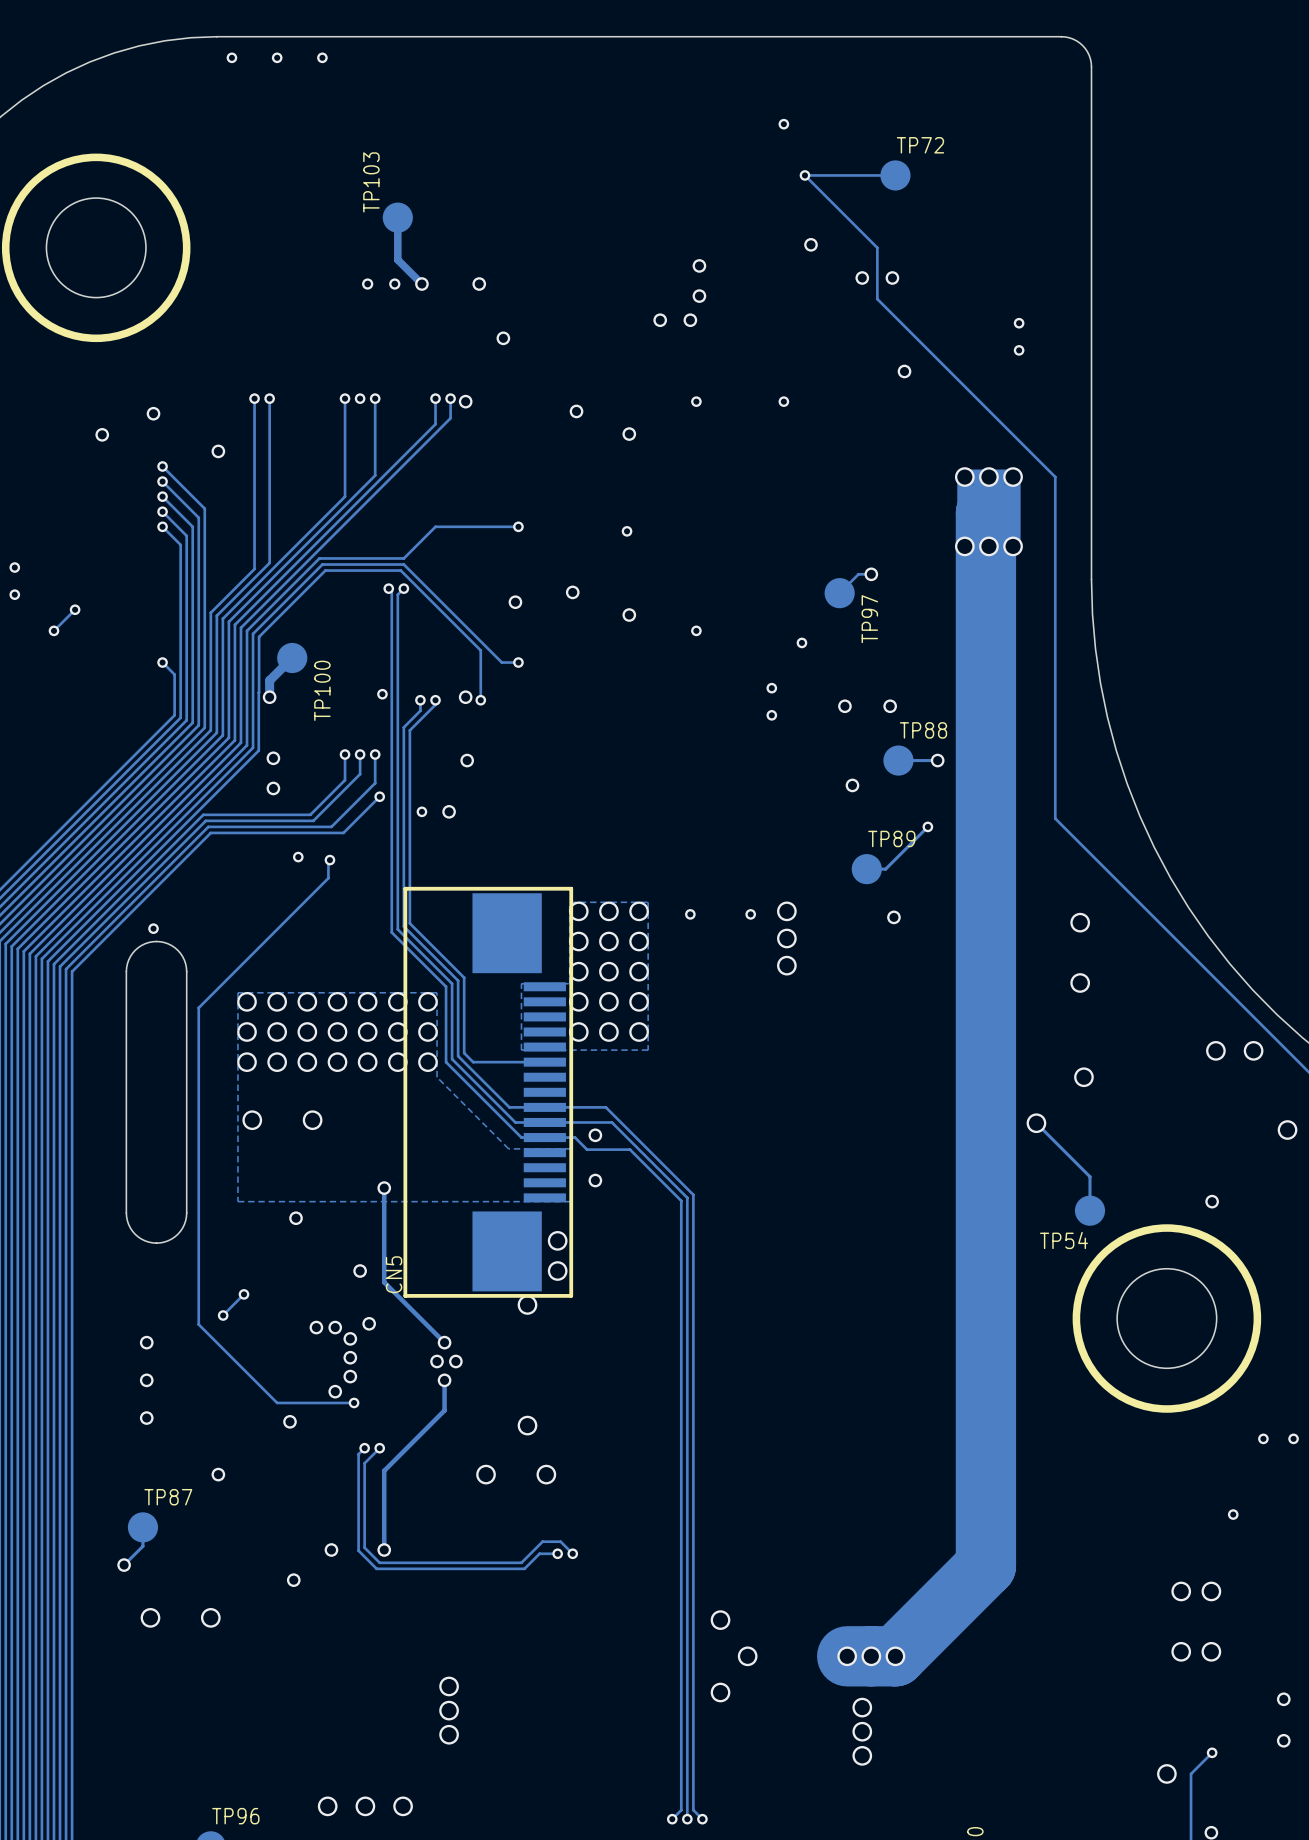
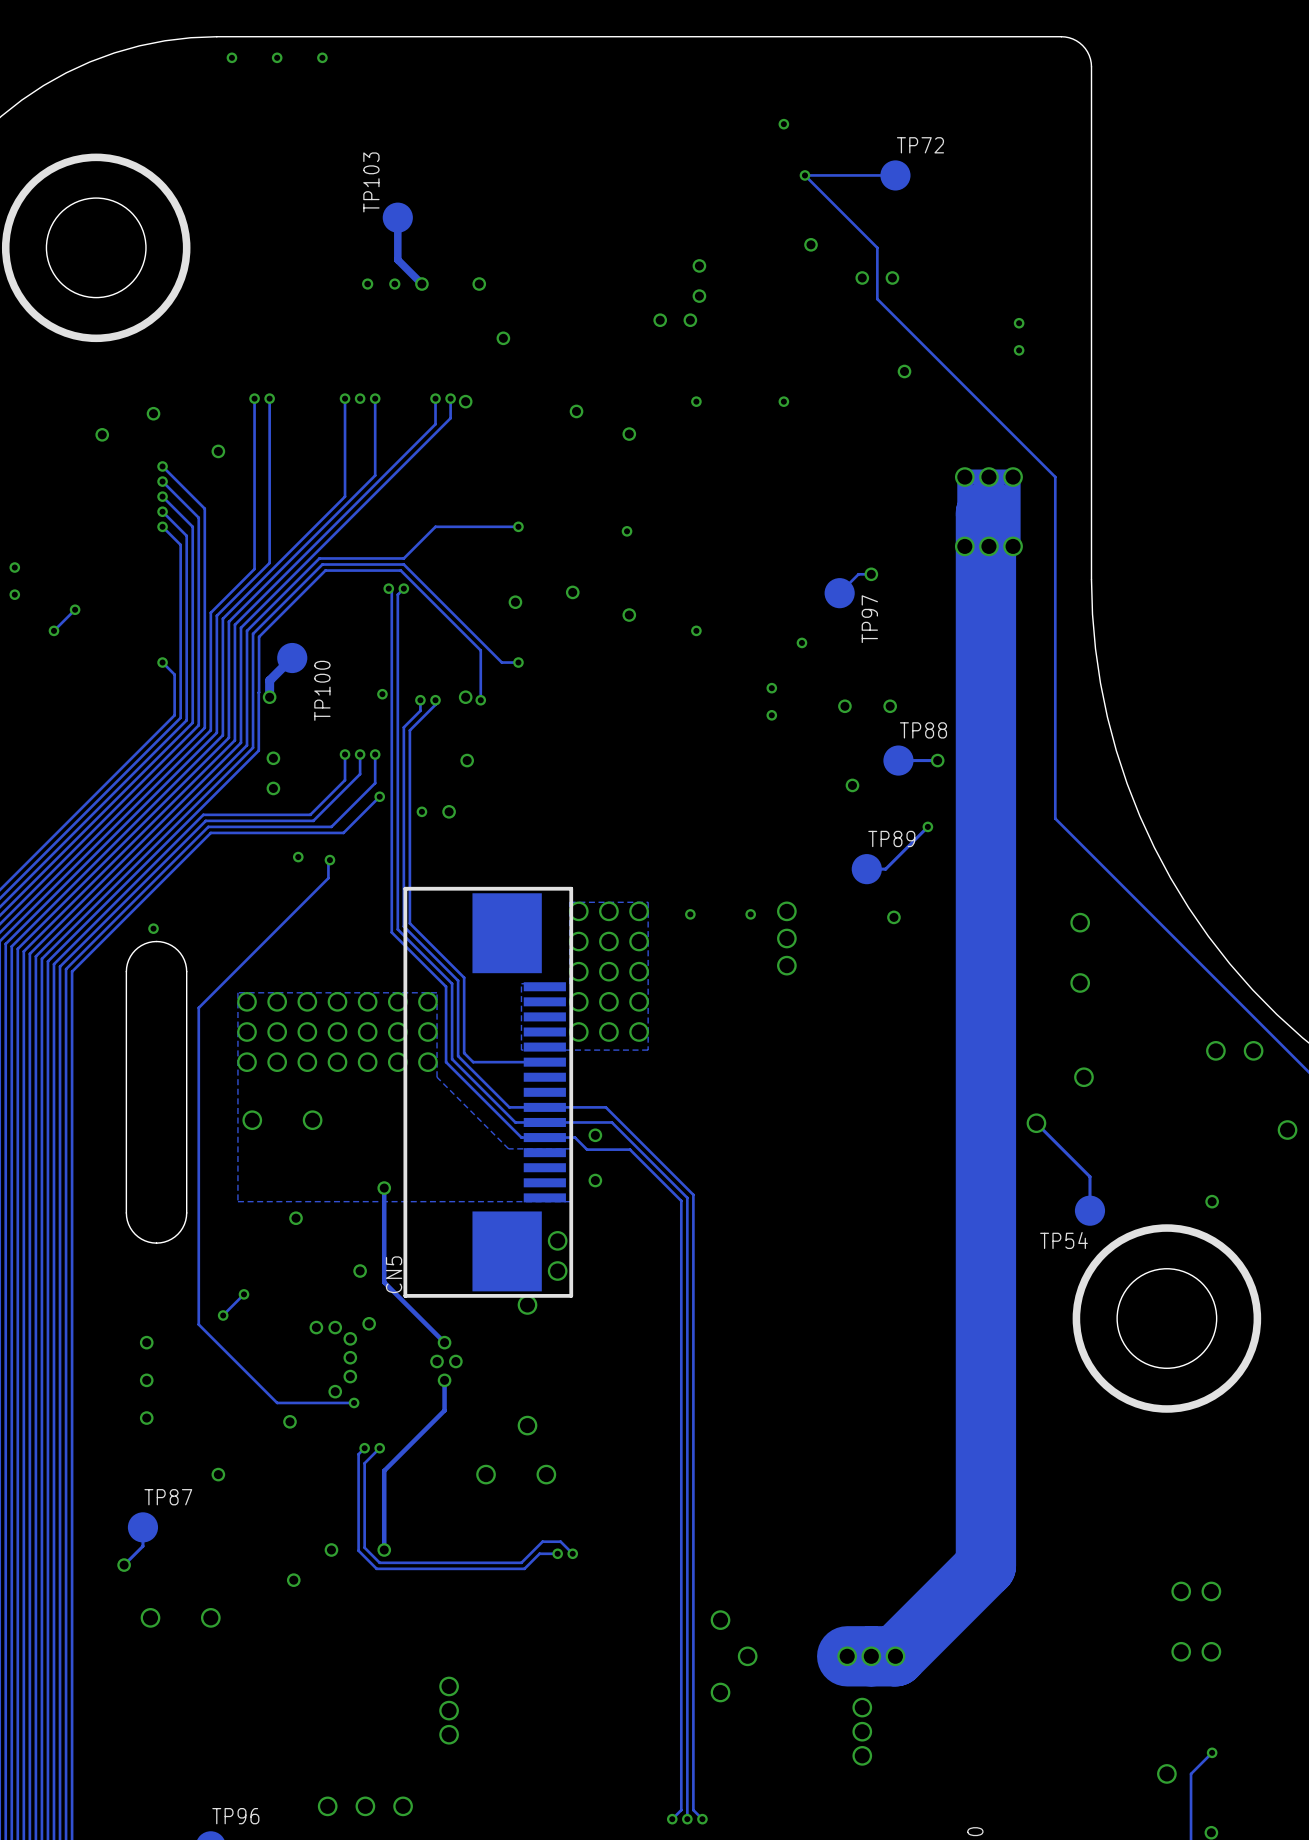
via: (1263, 1438) -> none
via: (1293, 1438) -> none
via: (1233, 1514) -> none
via: (1283, 1699) -> none
via: (1283, 1740) -> none

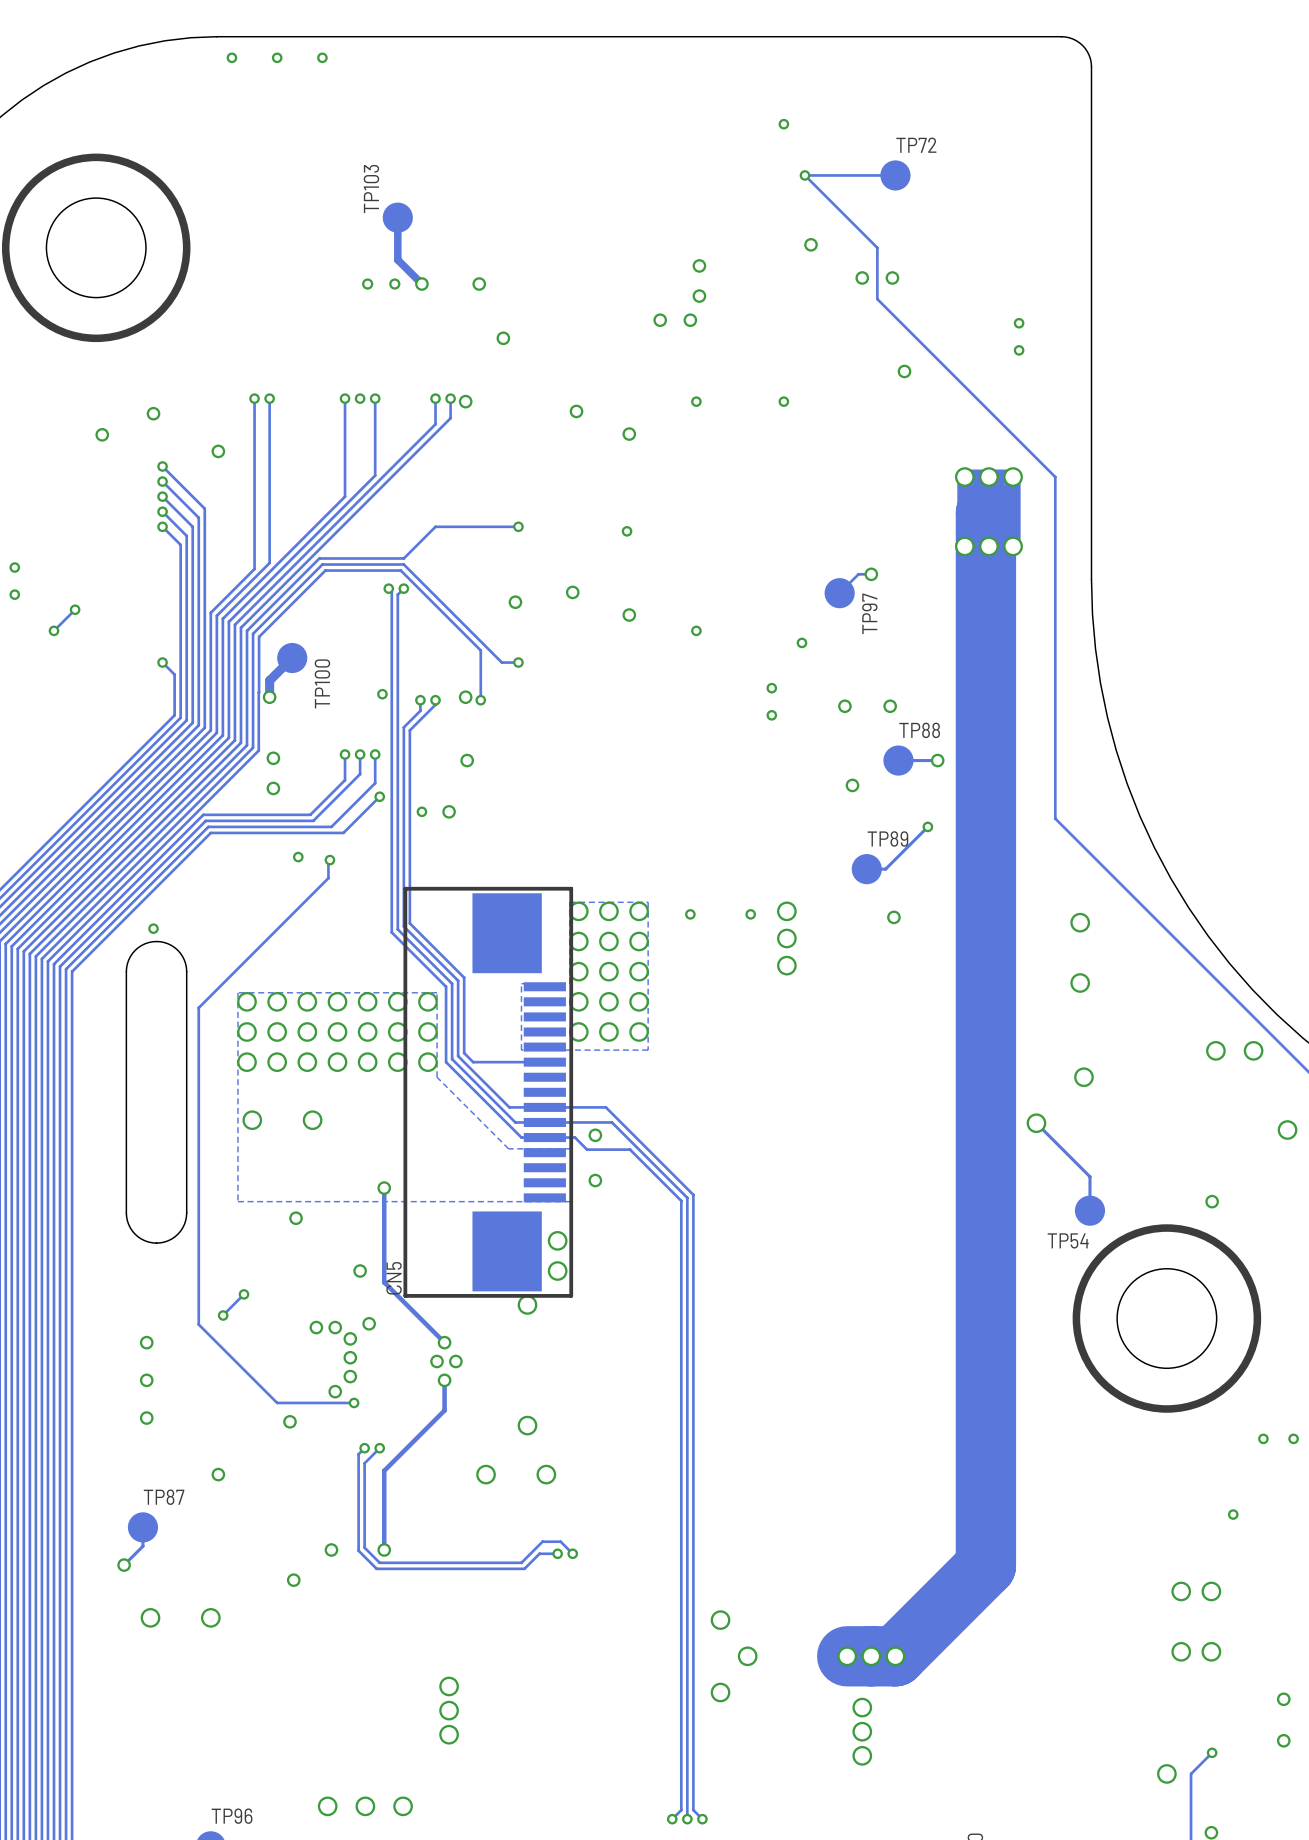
via: none -> (1263, 1438)
via: none -> (1293, 1438)
via: none -> (1233, 1514)
via: none -> (1283, 1699)
via: none -> (1283, 1740)

